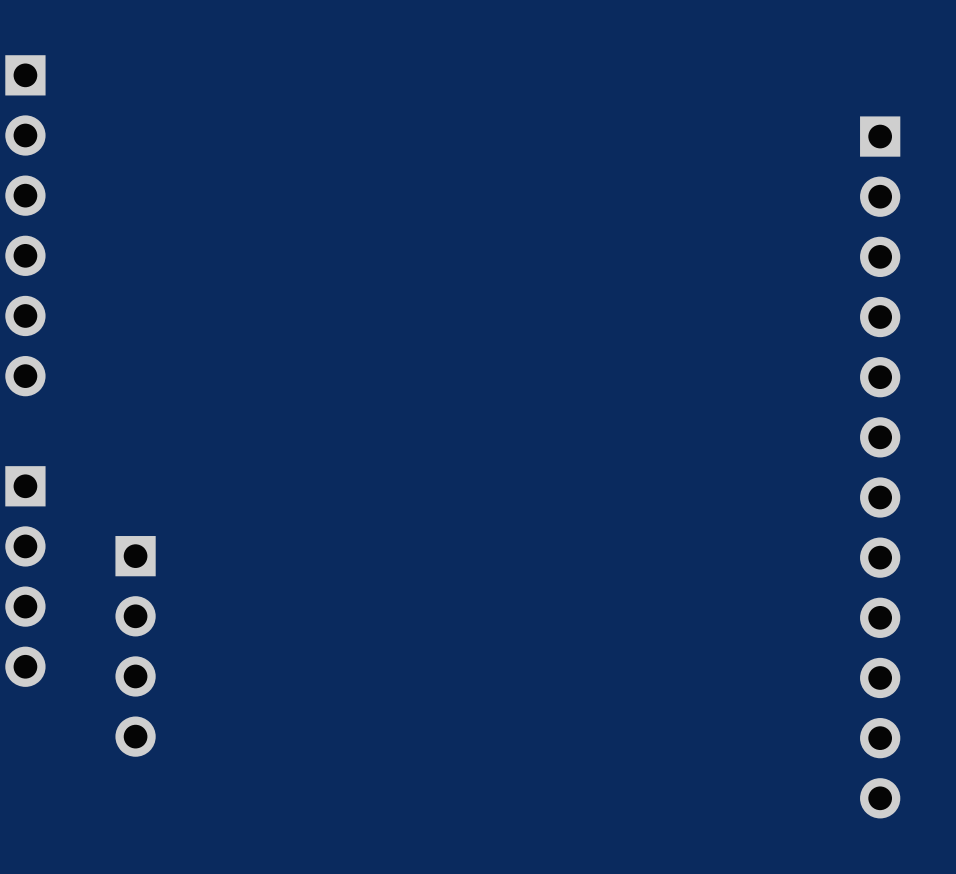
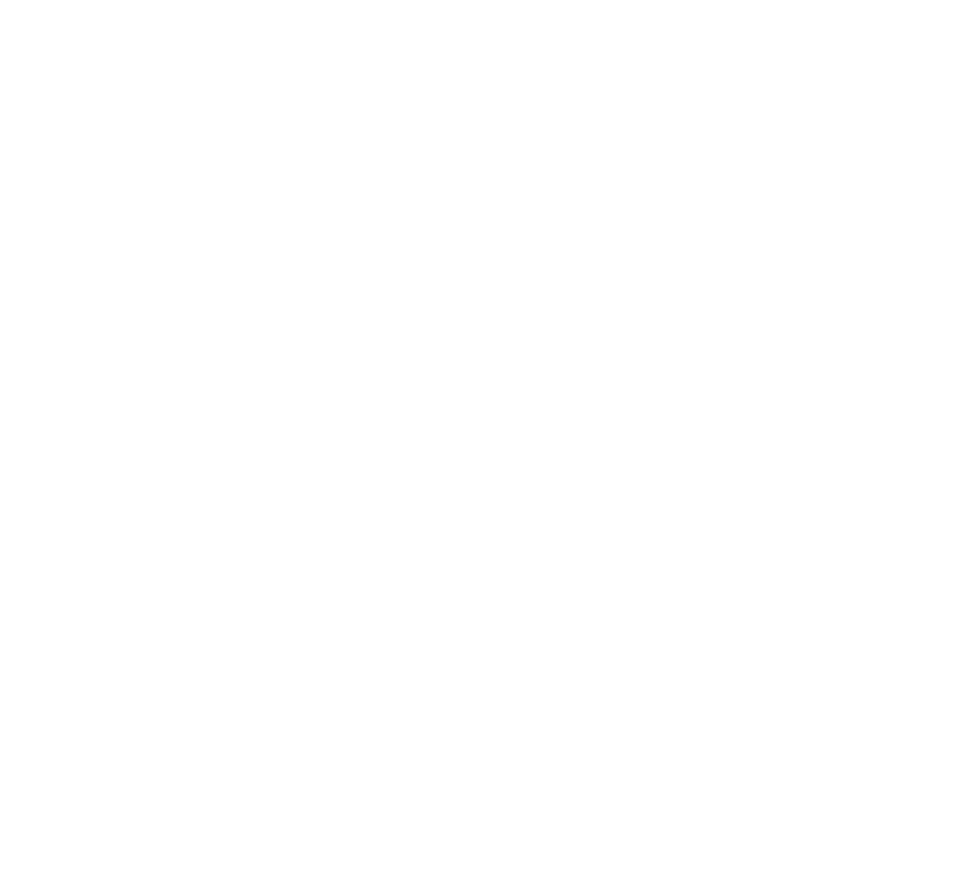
part: (25, 225) -> none
part: (880, 467) -> none
part: (25, 576) -> none
part: (135, 646) -> none

